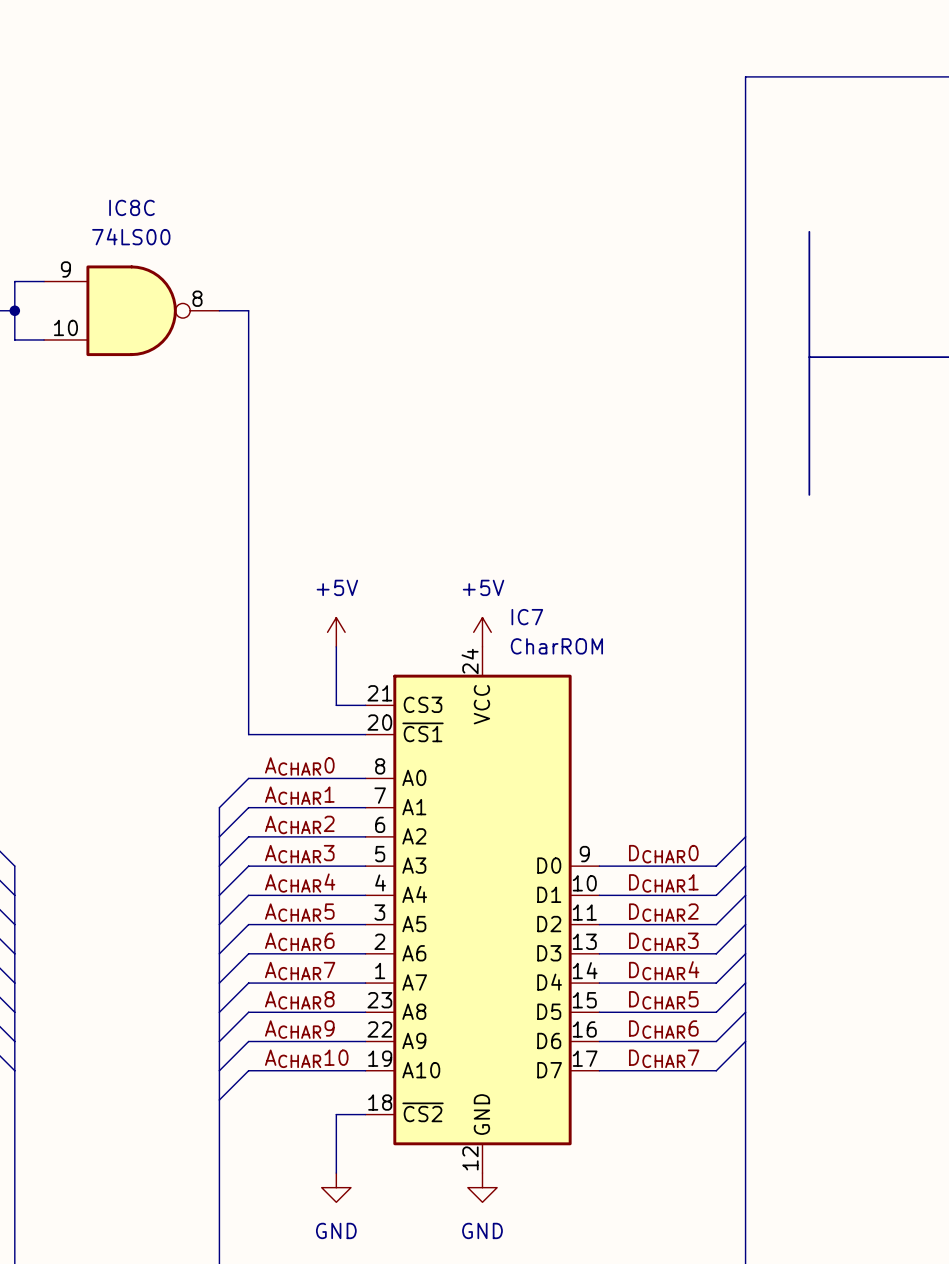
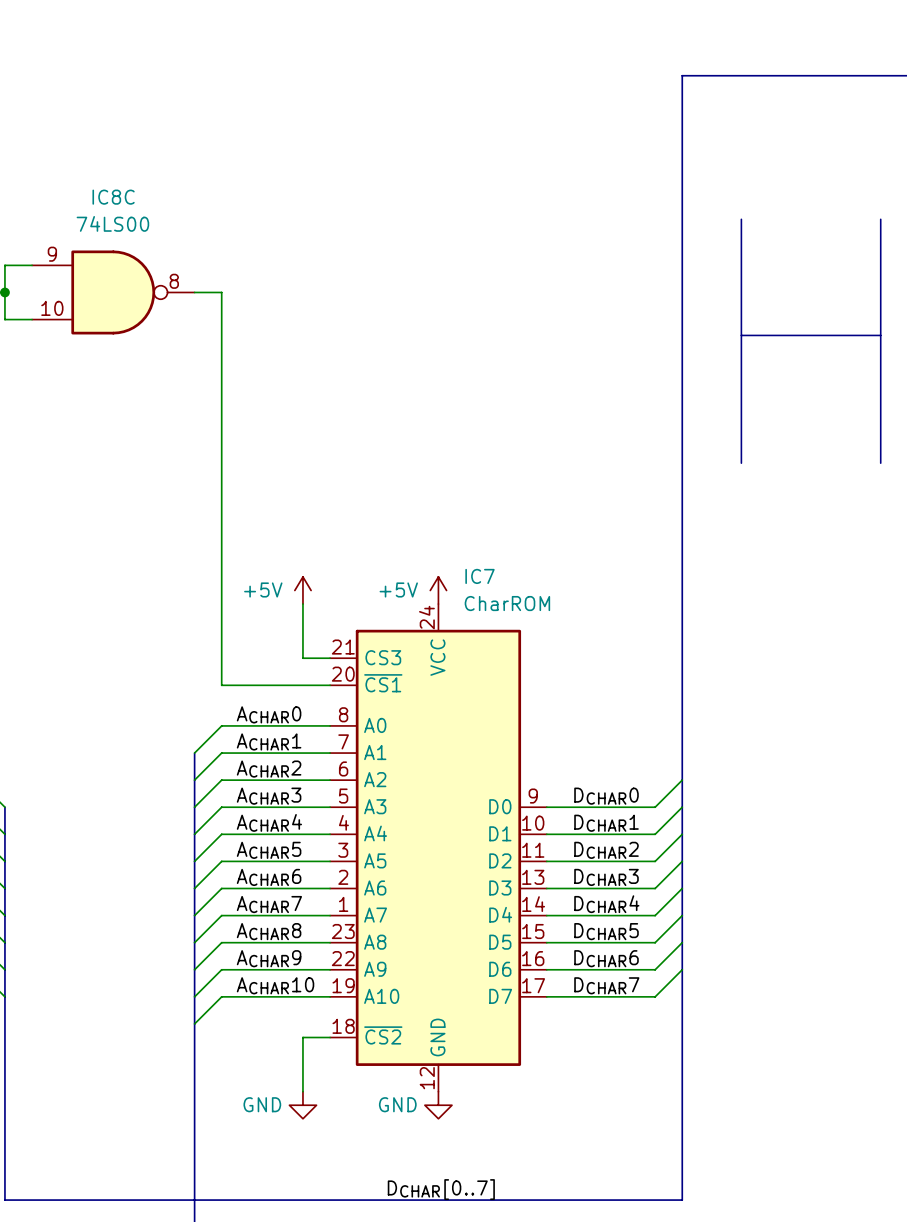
power symbol text position: +5V (337, 587) -> +5V (263, 589)
power symbol text position: +5V (483, 587) -> +5V (398, 589)
power symbol text position: GND (336, 1230) -> GND (262, 1104)
power symbol text position: GND (482, 1230) -> GND (397, 1104)

